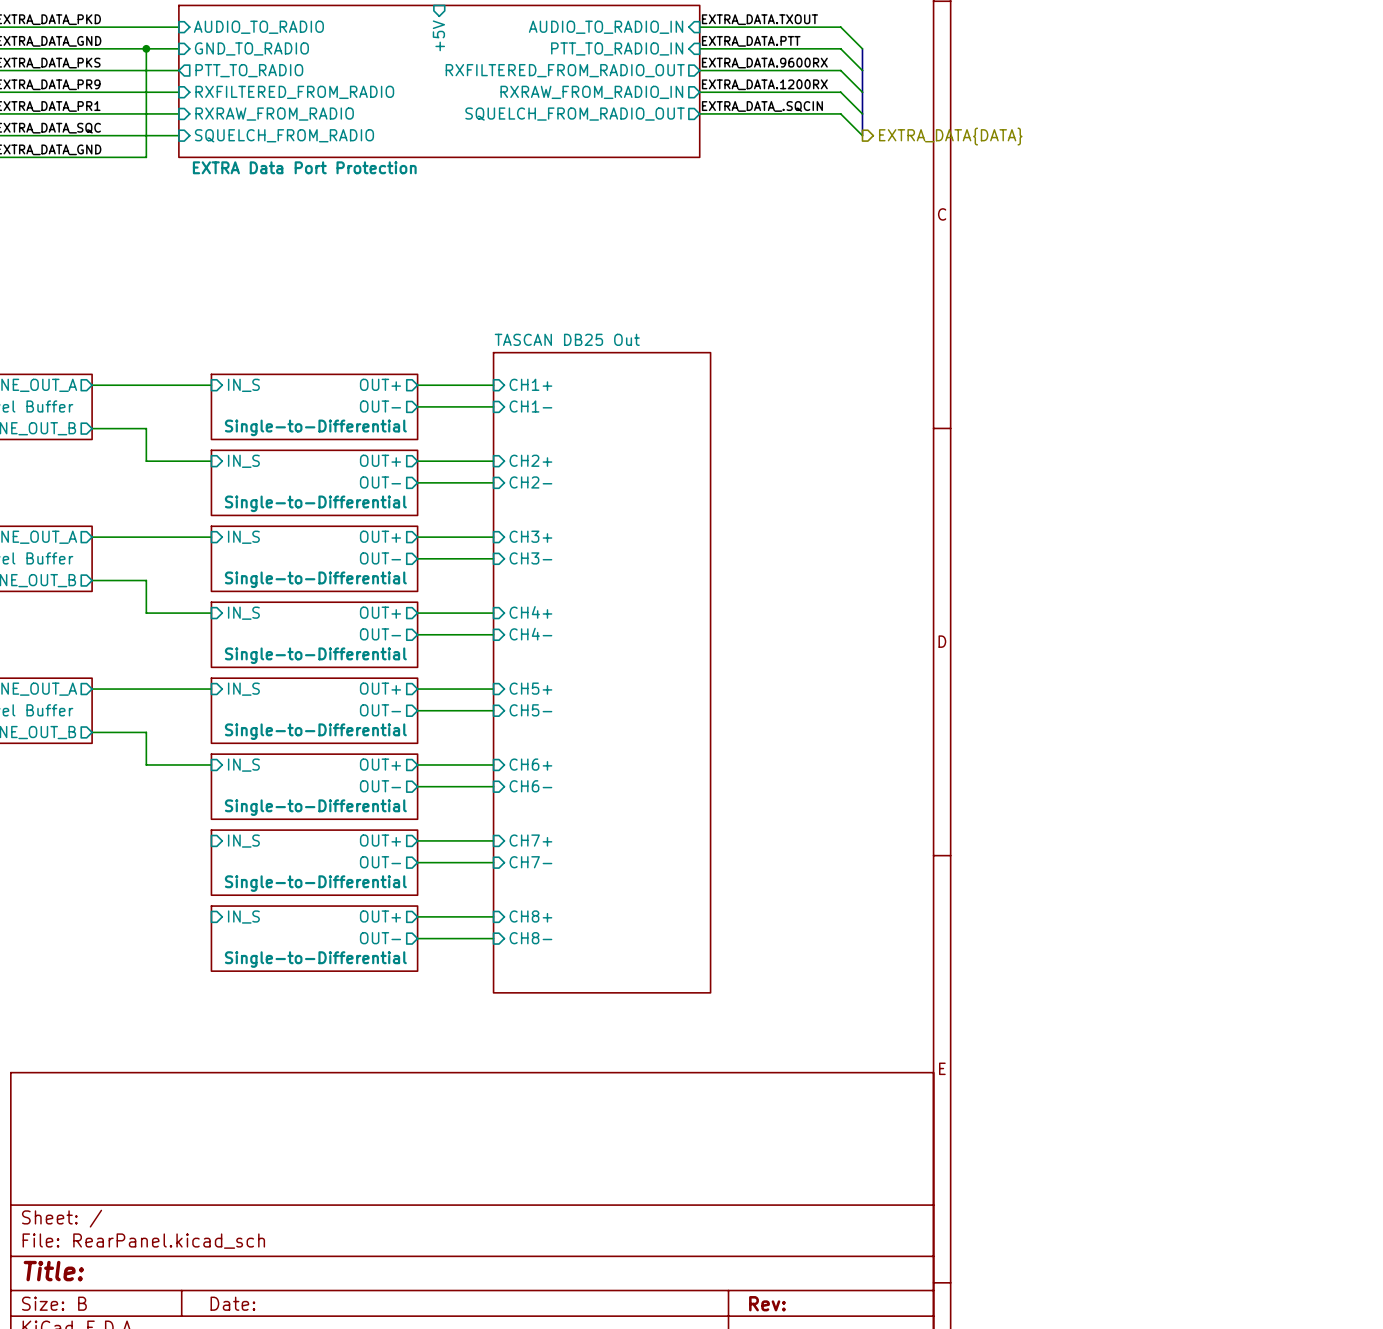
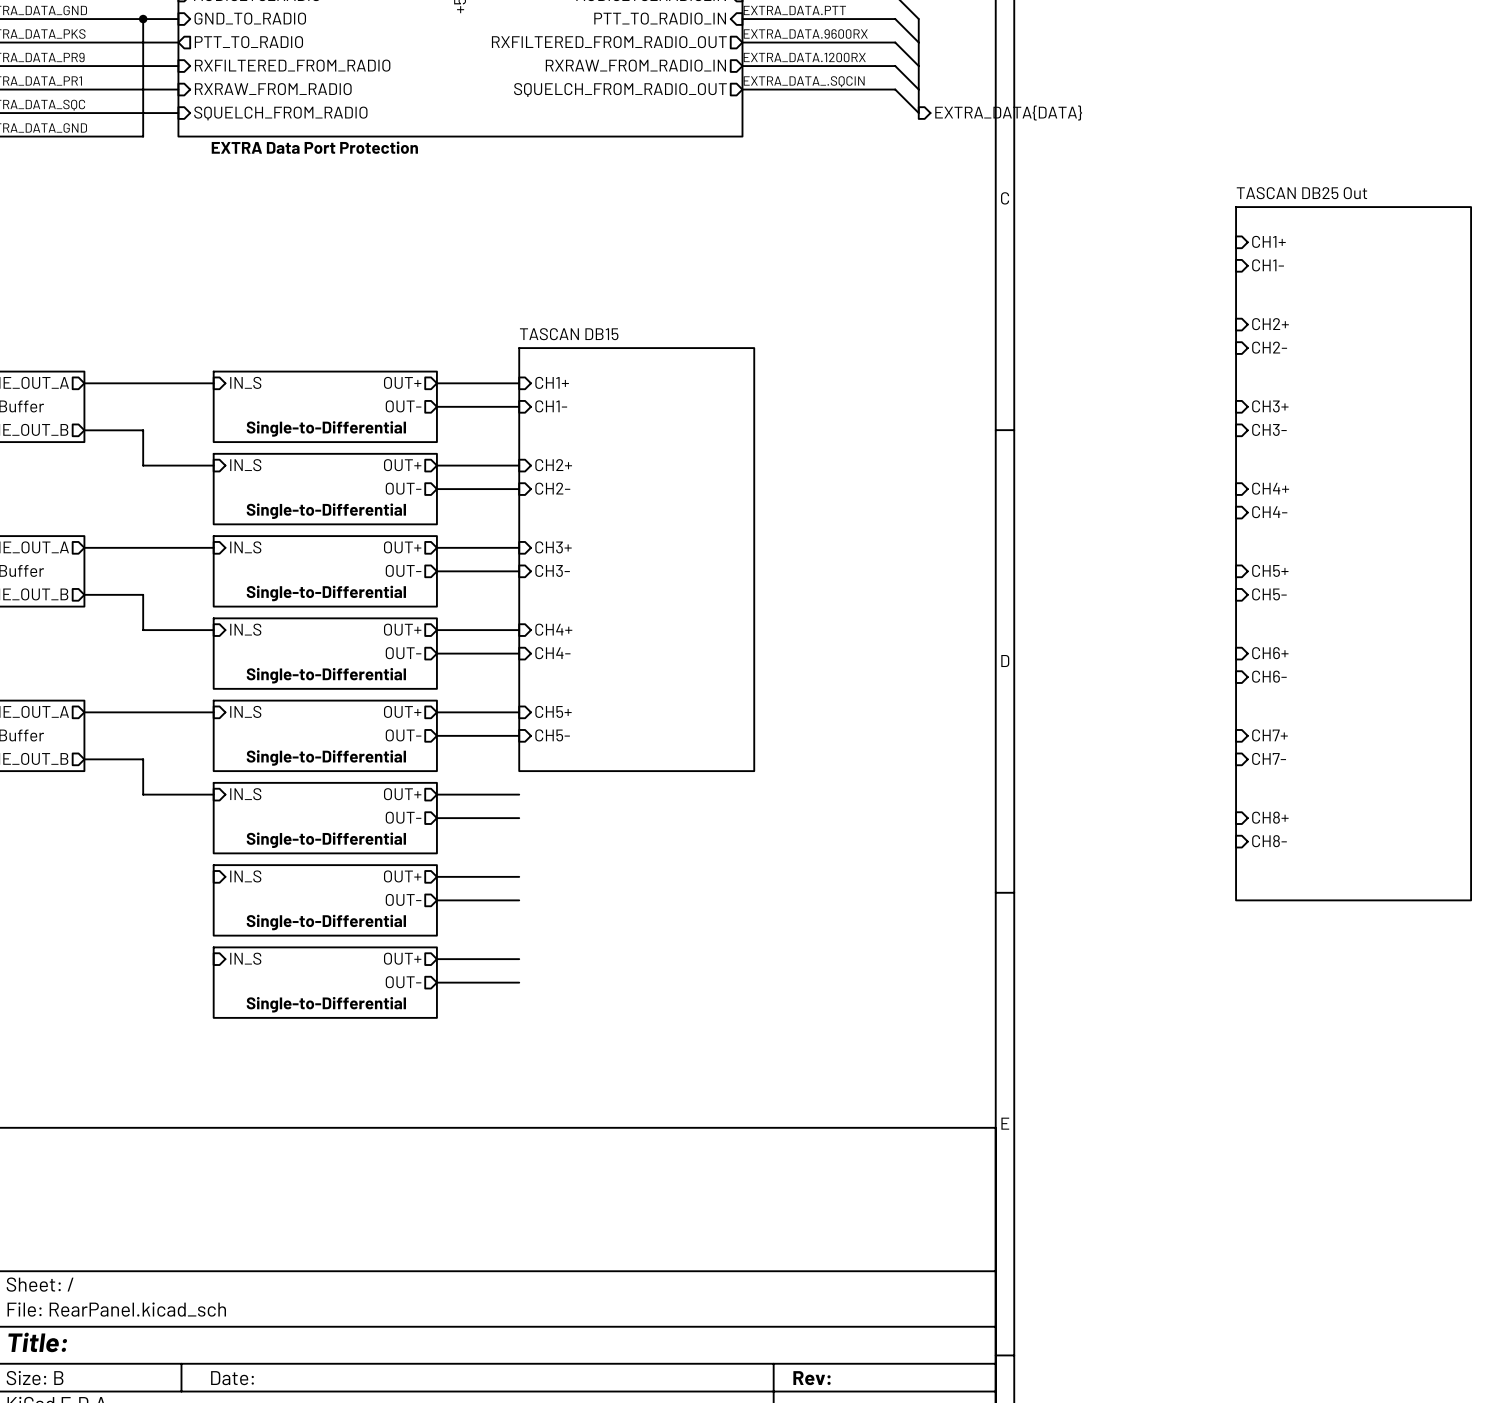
sheet pin: none -> CH1+ (1268, 241)
sheet pin: none -> CH1- (1268, 265)
sheet pin: none -> CH2+ (1270, 324)
sheet pin: none -> CH2- (1269, 347)
sheet pin: none -> CH3+ (1270, 406)
sheet pin: none -> CH3- (1269, 429)
sheet pin: none -> CH4+ (1270, 488)
sheet pin: none -> CH4- (1269, 512)
sheet TASCAN DB15: none -> (636, 559)
sheet pin: none -> CH5+ (1270, 570)
sheet pin: none -> CH5- (1269, 594)
sheet pin: none -> CH6+ (1270, 653)
sheet pin: none -> CH6- (1269, 676)
sheet TASCAN DB25 Out position: (602, 672) -> (1353, 553)
sheet pin: none -> CH7+ (1269, 735)
sheet pin: none -> CH7- (1269, 758)
sheet pin: CH6+ (530, 764) -> none
sheet pin: CH6- (530, 786) -> none
sheet pin: none -> CH8+ (1270, 817)
sheet pin: none -> CH8- (1269, 841)
sheet pin: CH7+ (530, 840) -> none
sheet pin: CH7- (530, 862) -> none
sheet pin: CH8+ (530, 916) -> none
sheet pin: CH8- (530, 938) -> none

